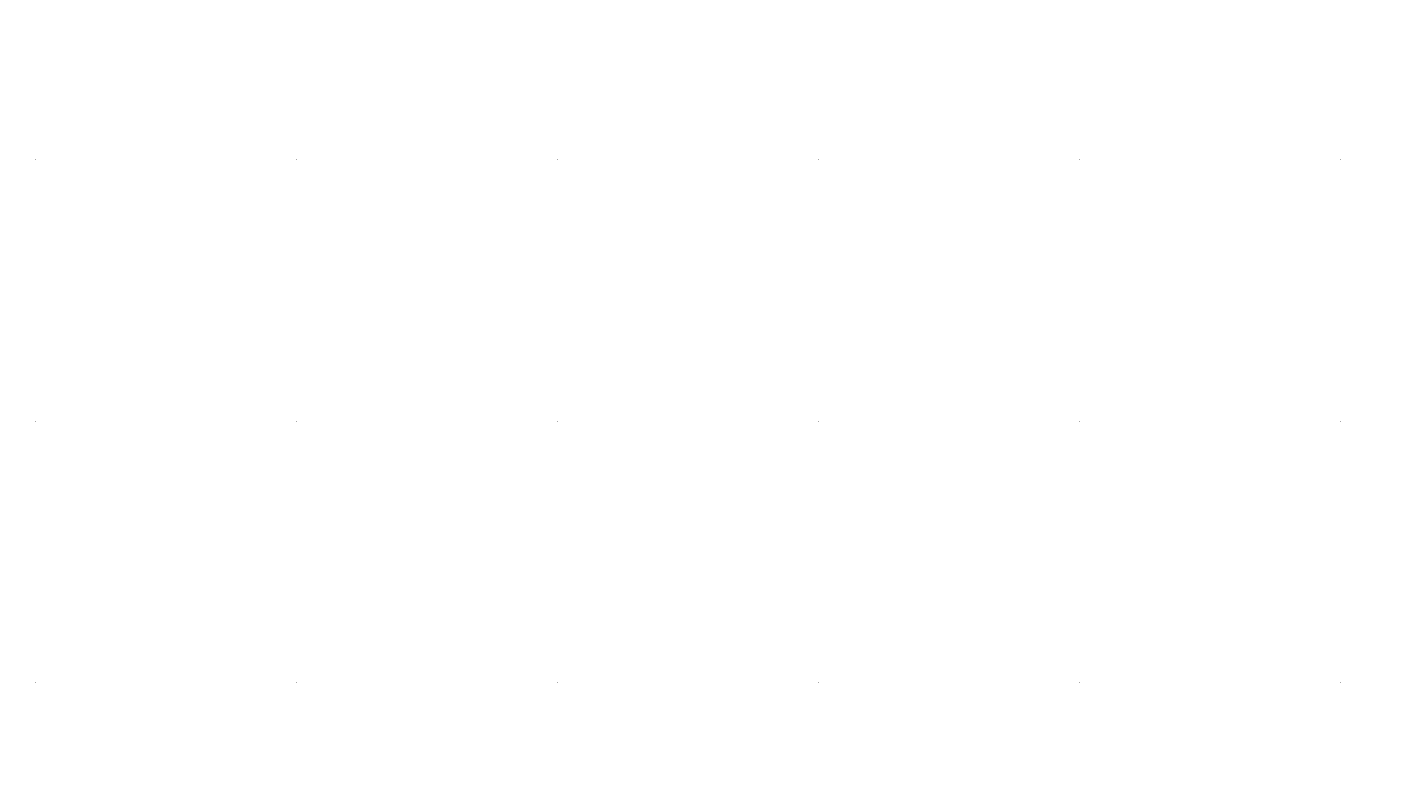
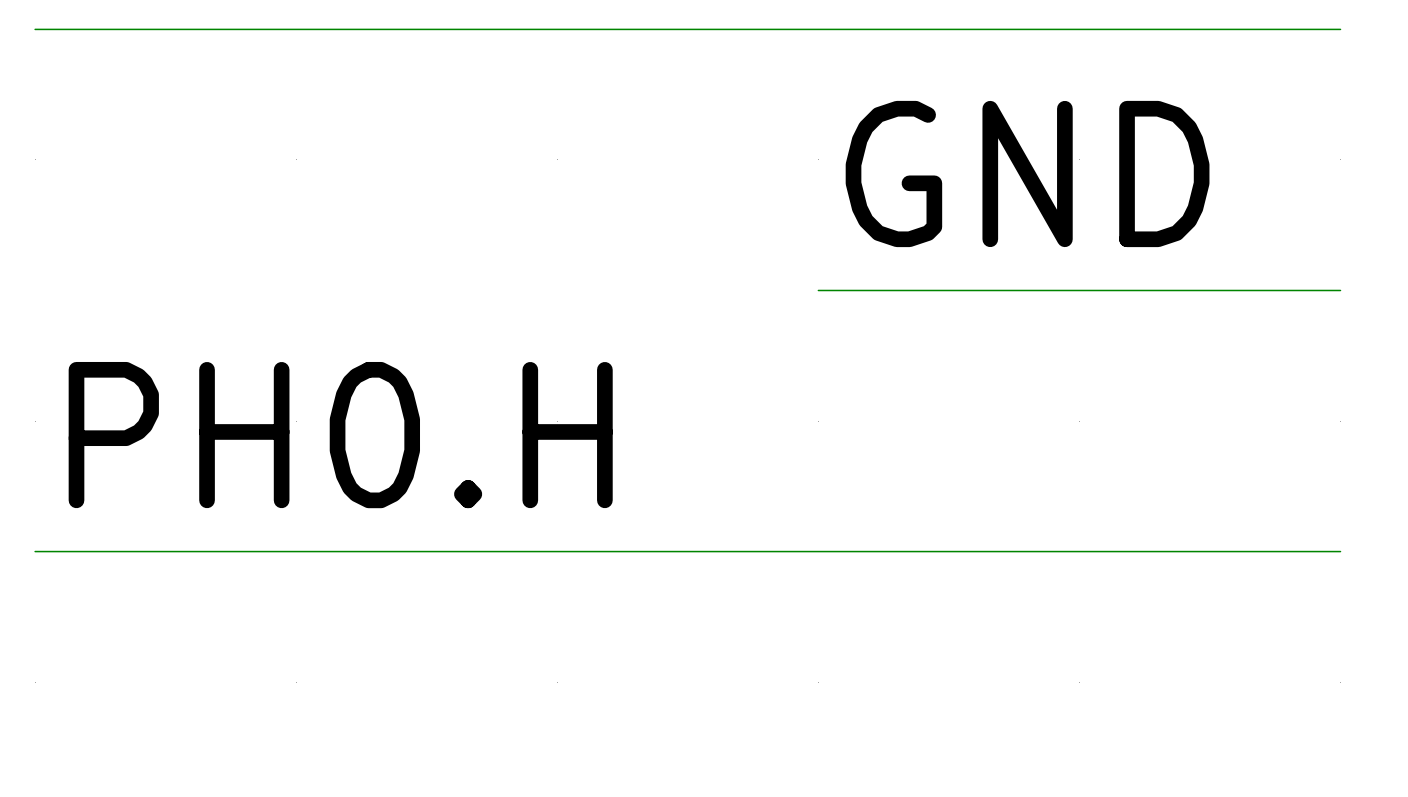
wire: none -> (35, 29) (1340, 29)
label: none -> GND (1027, 173)
wire: none -> (818, 290) (1340, 290)
label: none -> PH0.H (340, 435)
wire: none -> (35, 551) (1340, 551)

